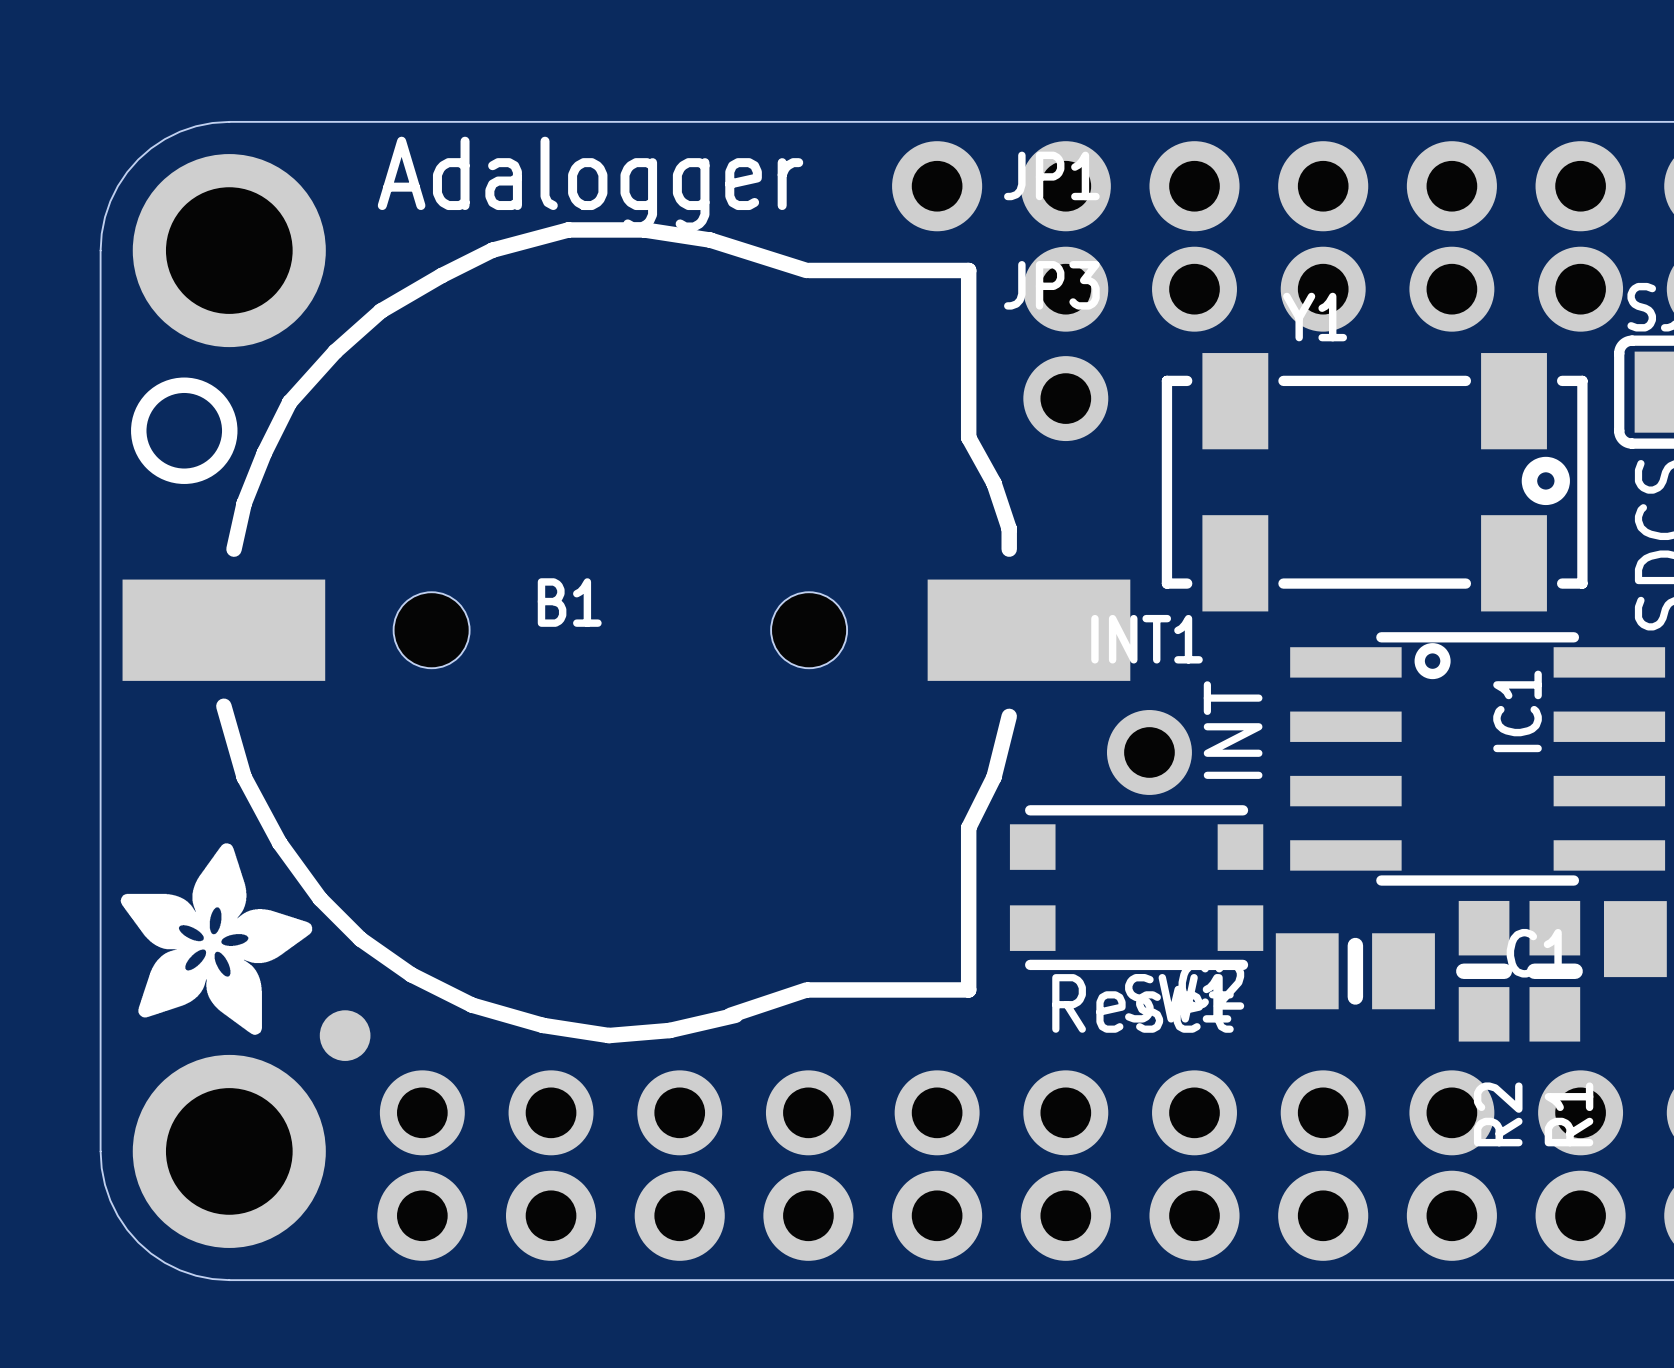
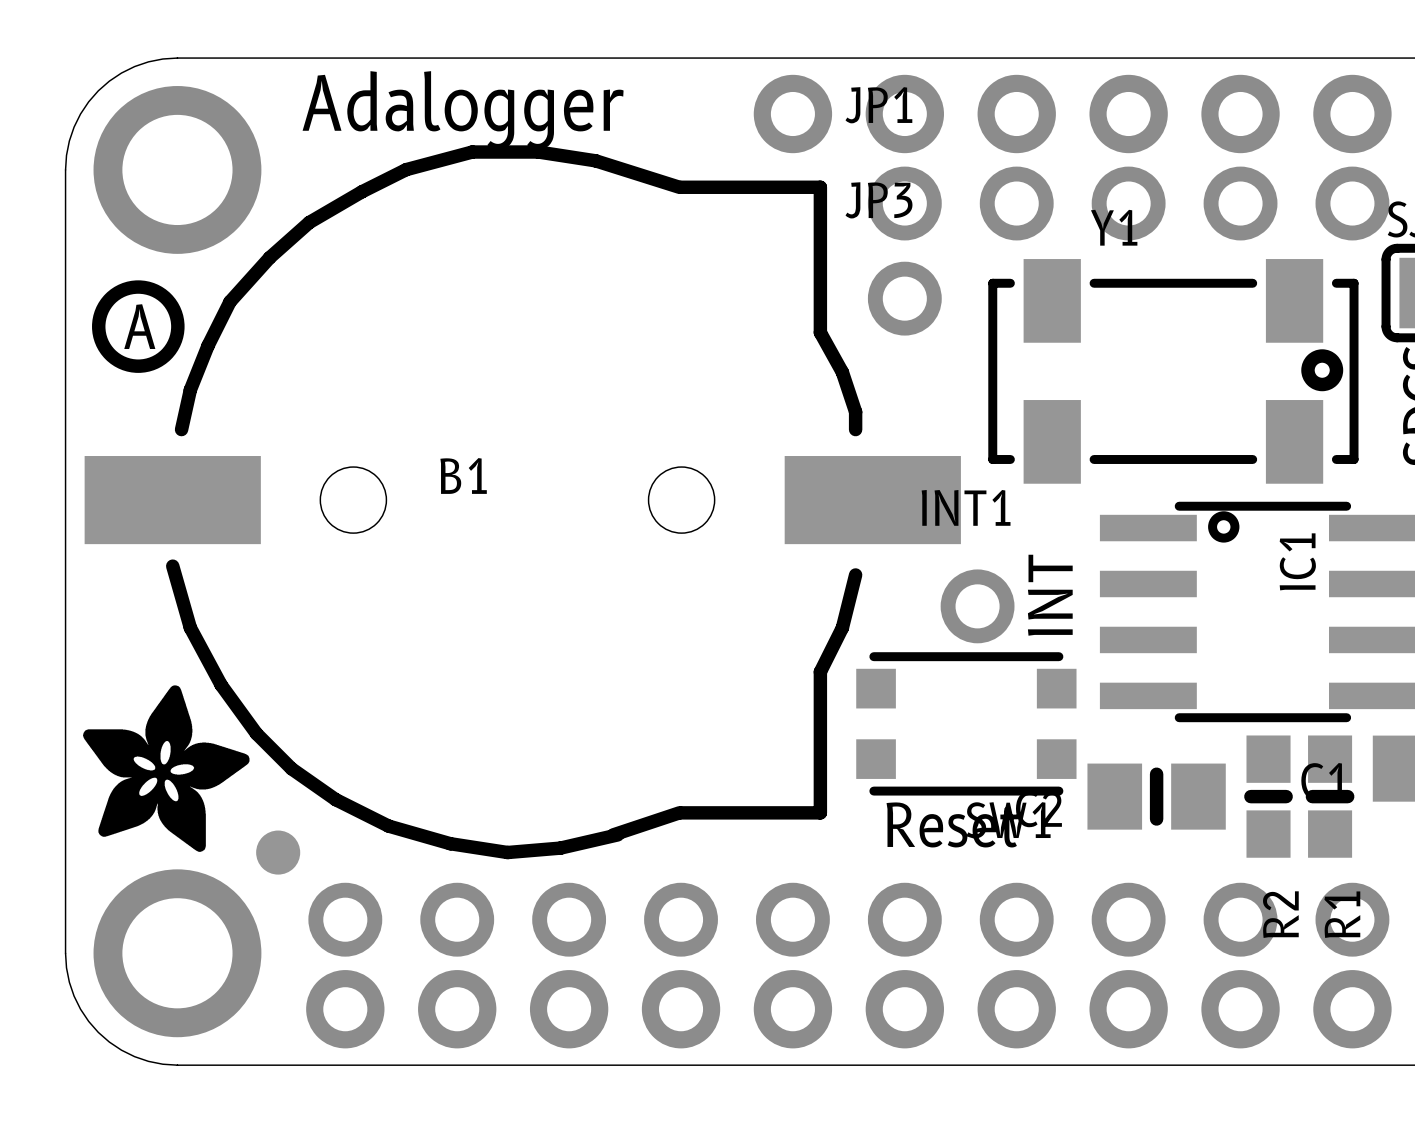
drawing shape: [131, 377, 238, 484] -> [92, 280, 185, 373]

